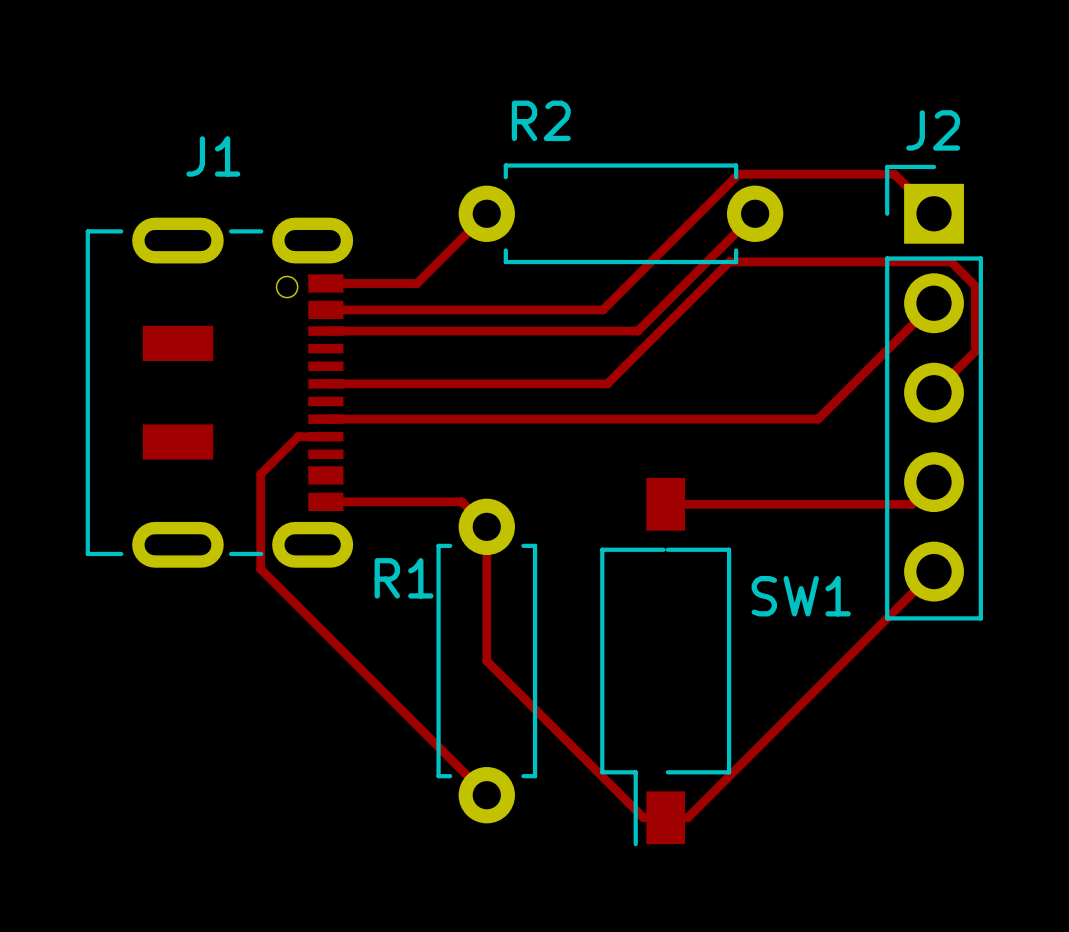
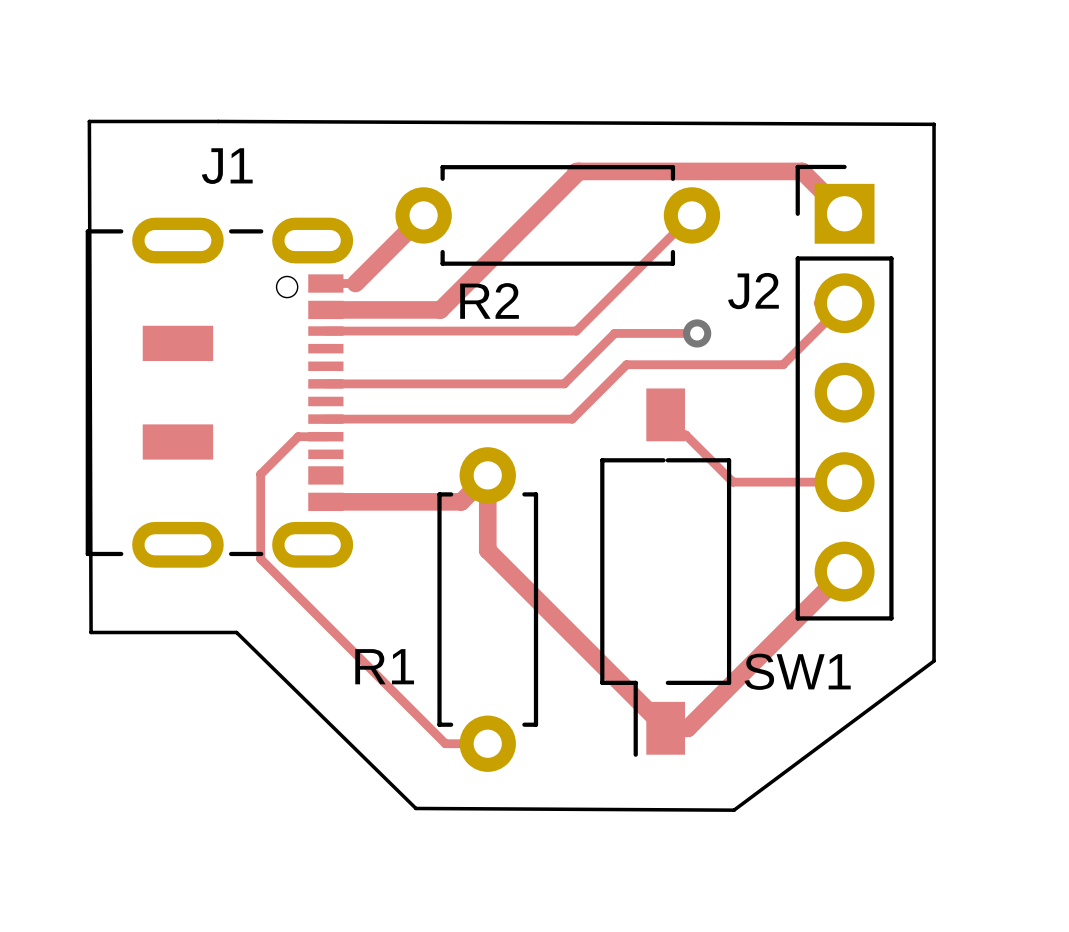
R2 name position: R2 (541, 120) -> R2 (489, 300)
board edge: none -> (89, 121) (91, 632) (236, 632) (415, 808) (734, 810) (934, 661) (934, 124) (89, 121)
J2 name position: J2 (933, 130) -> J2 (753, 291)
J1 name position: J1 (213, 156) -> J1 (227, 166)
track: none -> (576, 171) (802, 171) (844, 213)
track: (486, 213) (417, 283) (355, 283) -> (423, 215) (355, 283)
R2 position: (620, 213) -> (557, 215)
track: (755, 213) (637, 331) (576, 331) -> (691, 215) (576, 331)
track: (934, 213) (894, 174) (738, 174) (602, 309) (440, 309) -> (579, 171) (440, 309)
track: (934, 303) (818, 419) (572, 419) -> none
track width: thin (325, 309) (440, 309) -> thick (325, 309) (440, 309)
track: none -> (697, 333) (614, 333) (564, 383)
via: none -> (697, 333)
track: (626, 364) (729, 261) (951, 261) (975, 286) (975, 351) (934, 392) -> (626, 364) (783, 364) (844, 303) (818, 303)
track: (564, 383) (607, 383) -> (572, 419) (607, 383)
J2 position: (934, 392) -> (844, 392)
track: none -> (665, 434) (685, 434) (732, 482) (844, 482)
track: (934, 482) (911, 504) (665, 504) -> none
track width: thin (325, 501) (461, 501) -> thick (325, 501) (461, 501)
track: (461, 501) (486, 526) (486, 661) (643, 817) (687, 817) (934, 571) -> (461, 501) (487, 475) (487, 550) (665, 728) (687, 728) (844, 571)
track: (260, 559) (260, 569) (486, 795) -> (260, 559) (445, 743) (487, 743)
R1 name position: R1 (404, 578) -> R1 (384, 666)
SW1 name position: SW1 (801, 596) -> SW1 (797, 671)
R1 position: (486, 661) -> (487, 609)
SW1 position: (665, 662) -> (665, 572)

